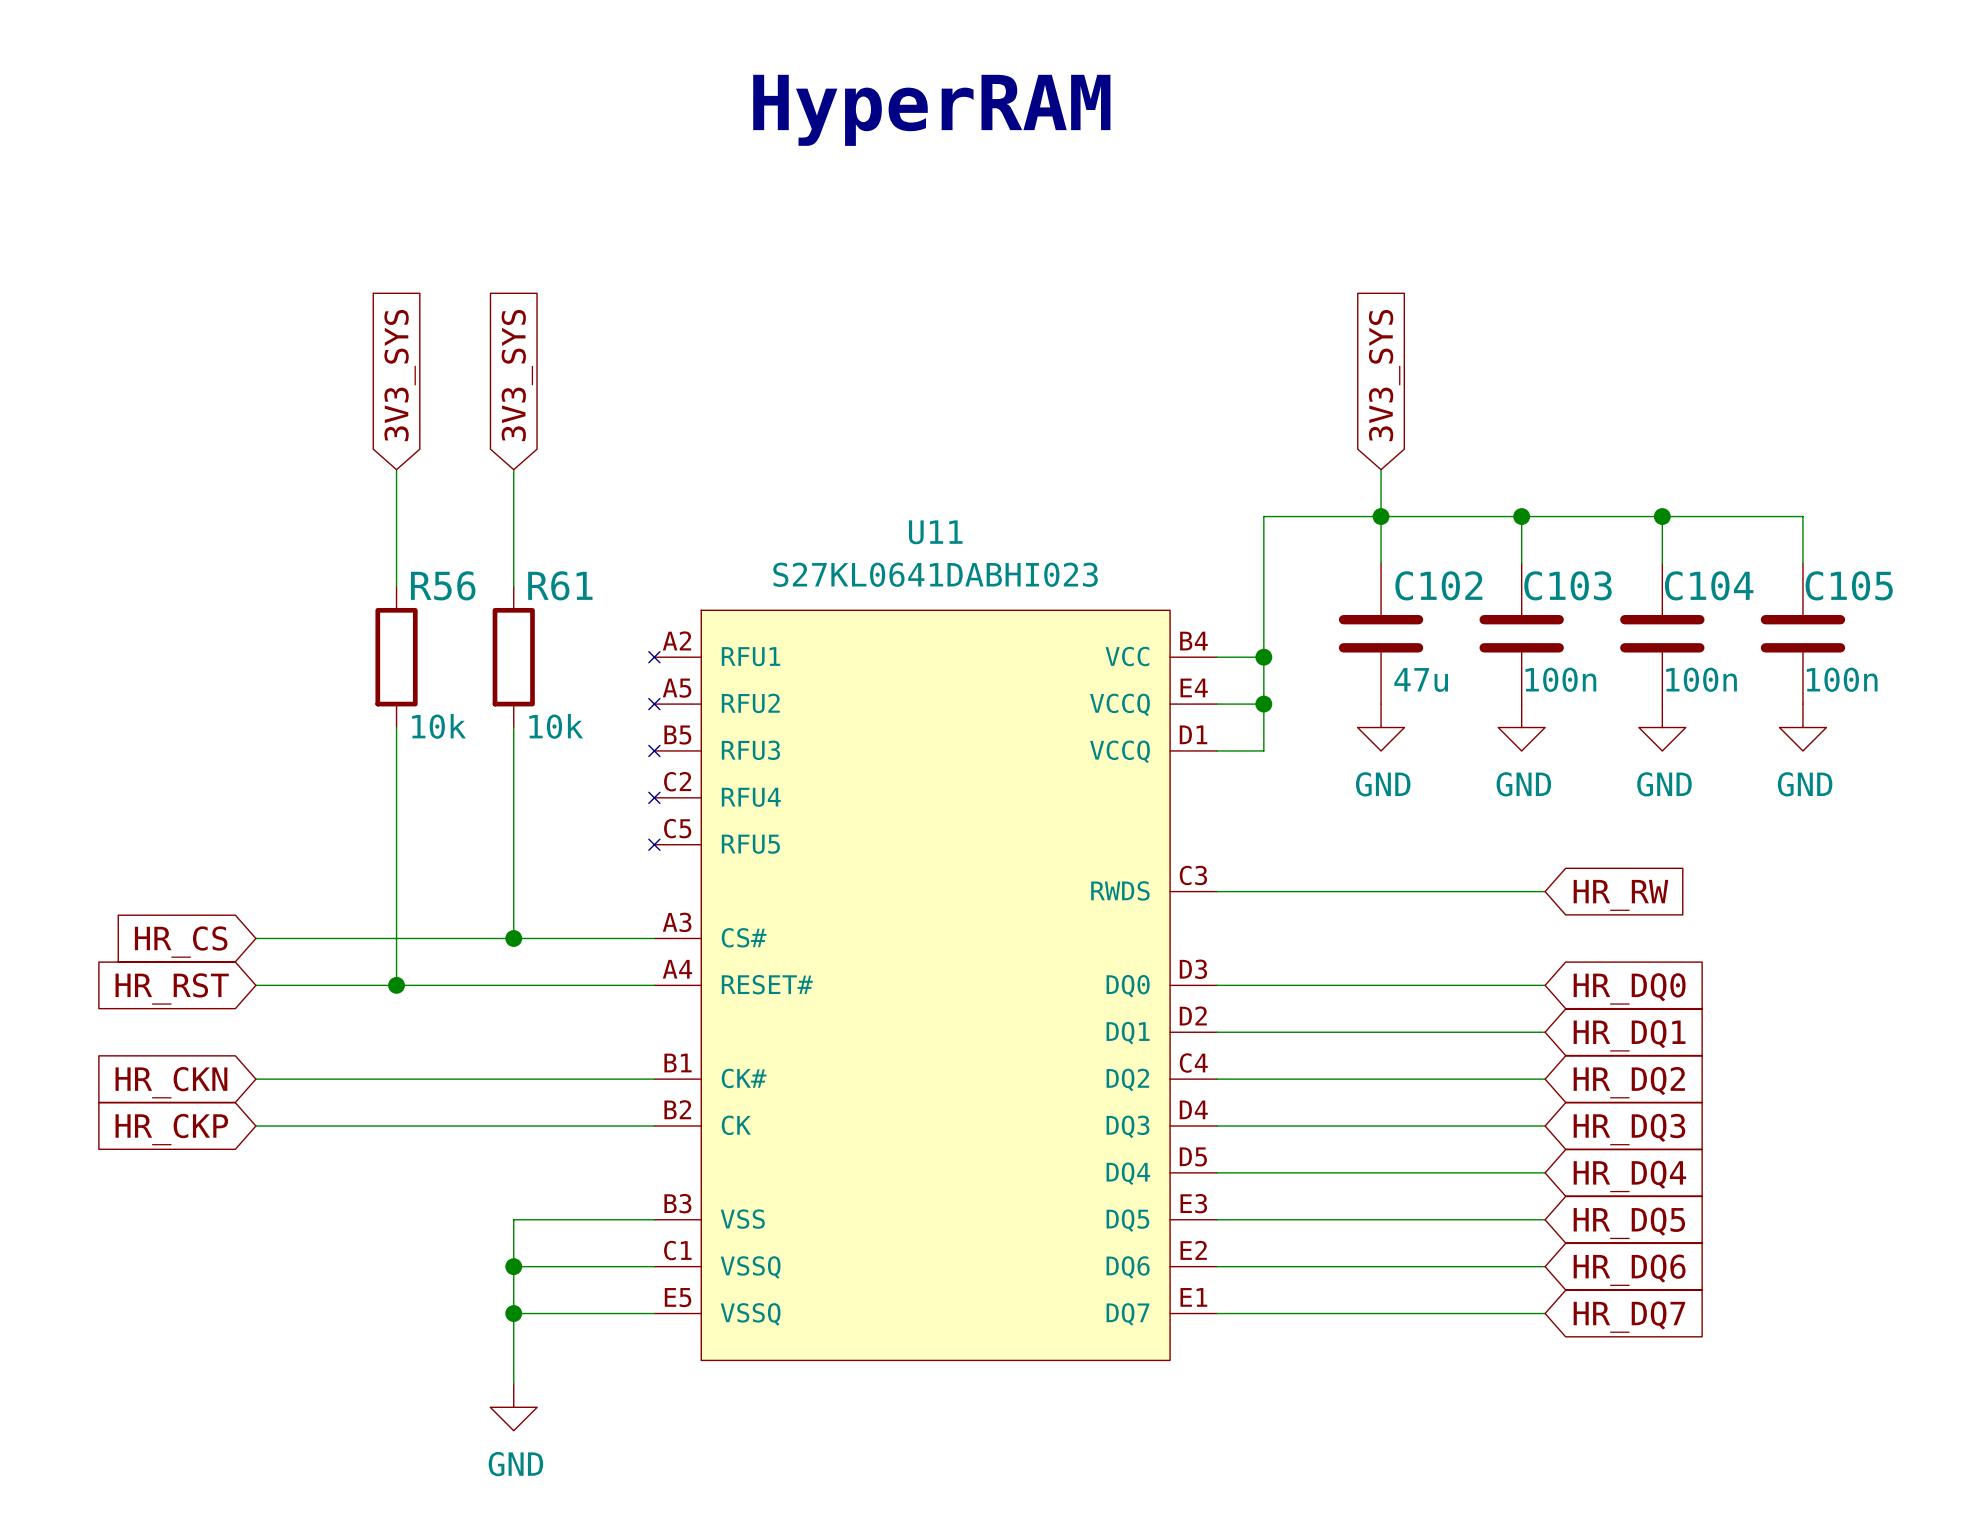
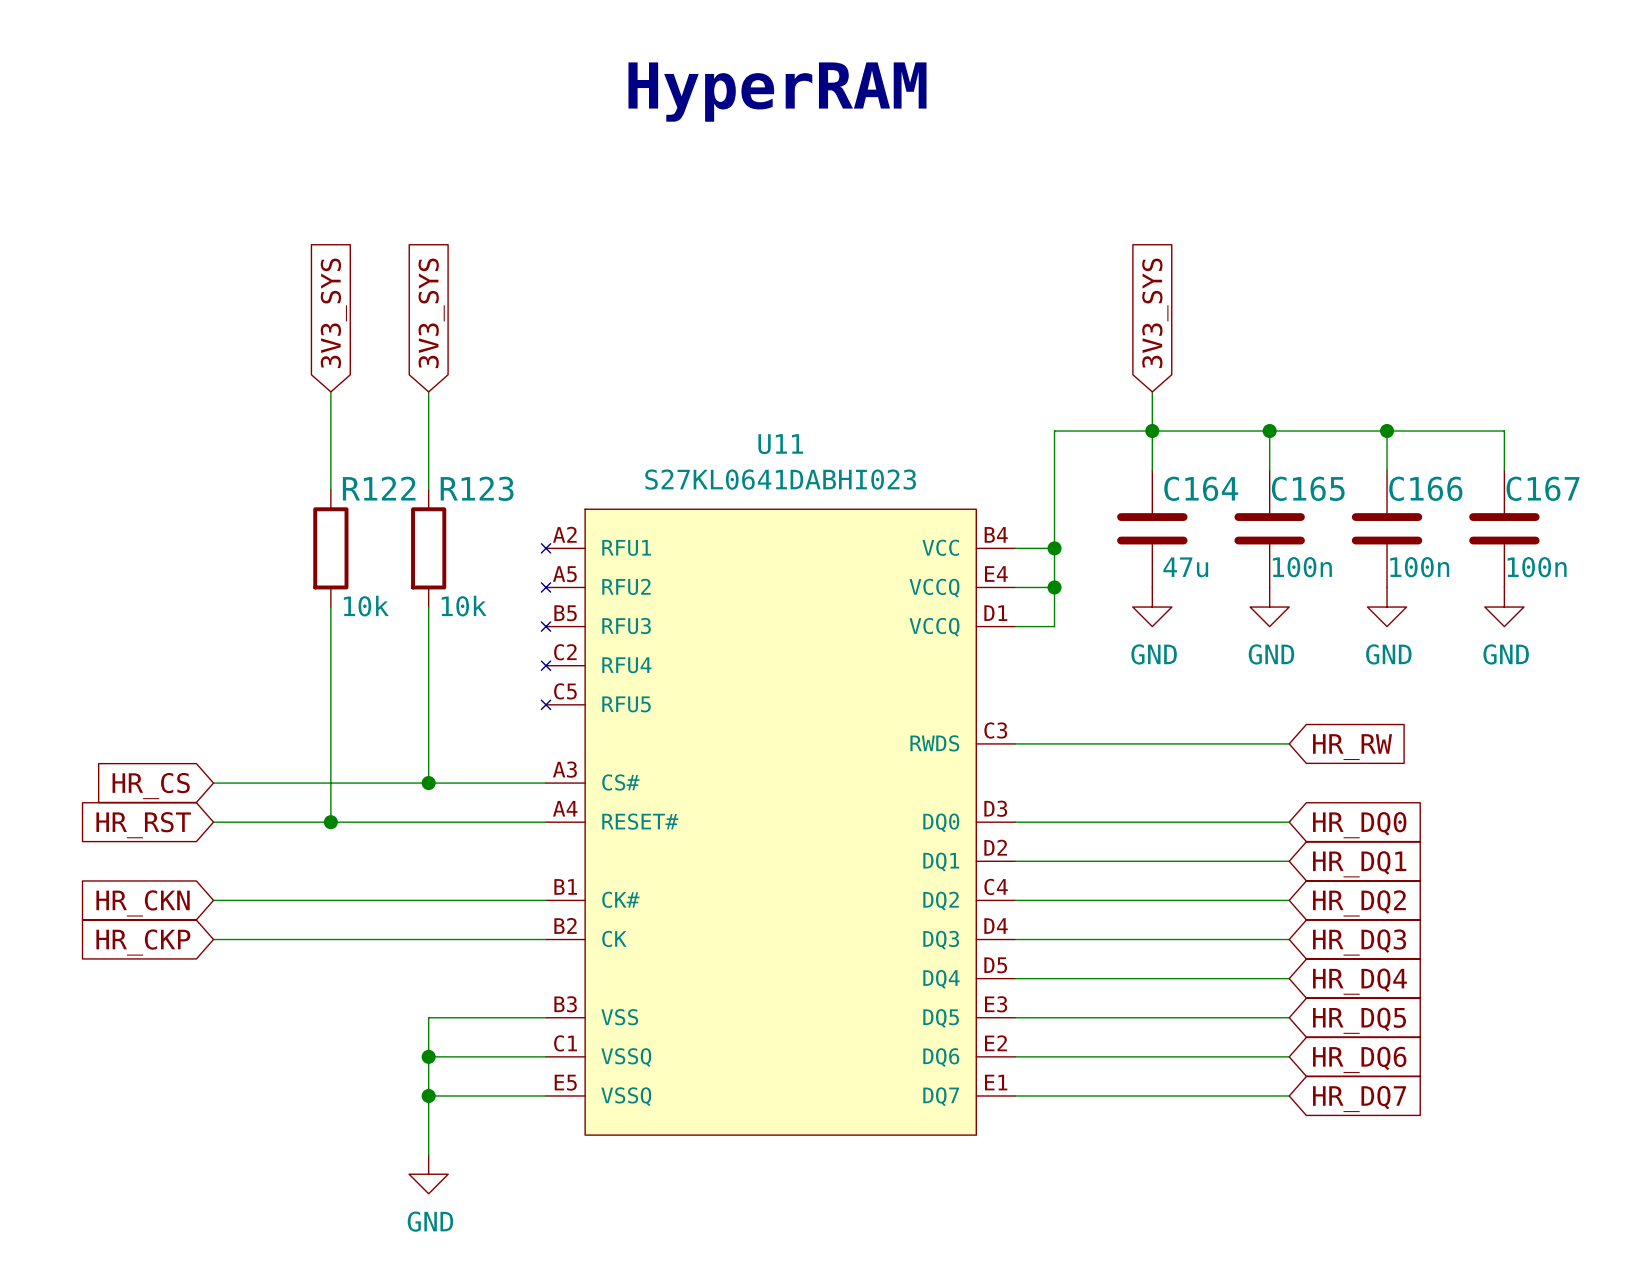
R56 name: R56 (443, 585) -> R122 (379, 488)
R61 name: R61 (560, 585) -> R123 (477, 488)
C102 name: C102 (1438, 585) -> C164 (1201, 488)
C103 name: C103 (1568, 585) -> C165 (1308, 488)
C104 name: C104 (1709, 585) -> C166 (1425, 488)
C105 name: C105 (1849, 585) -> C167 (1543, 488)

